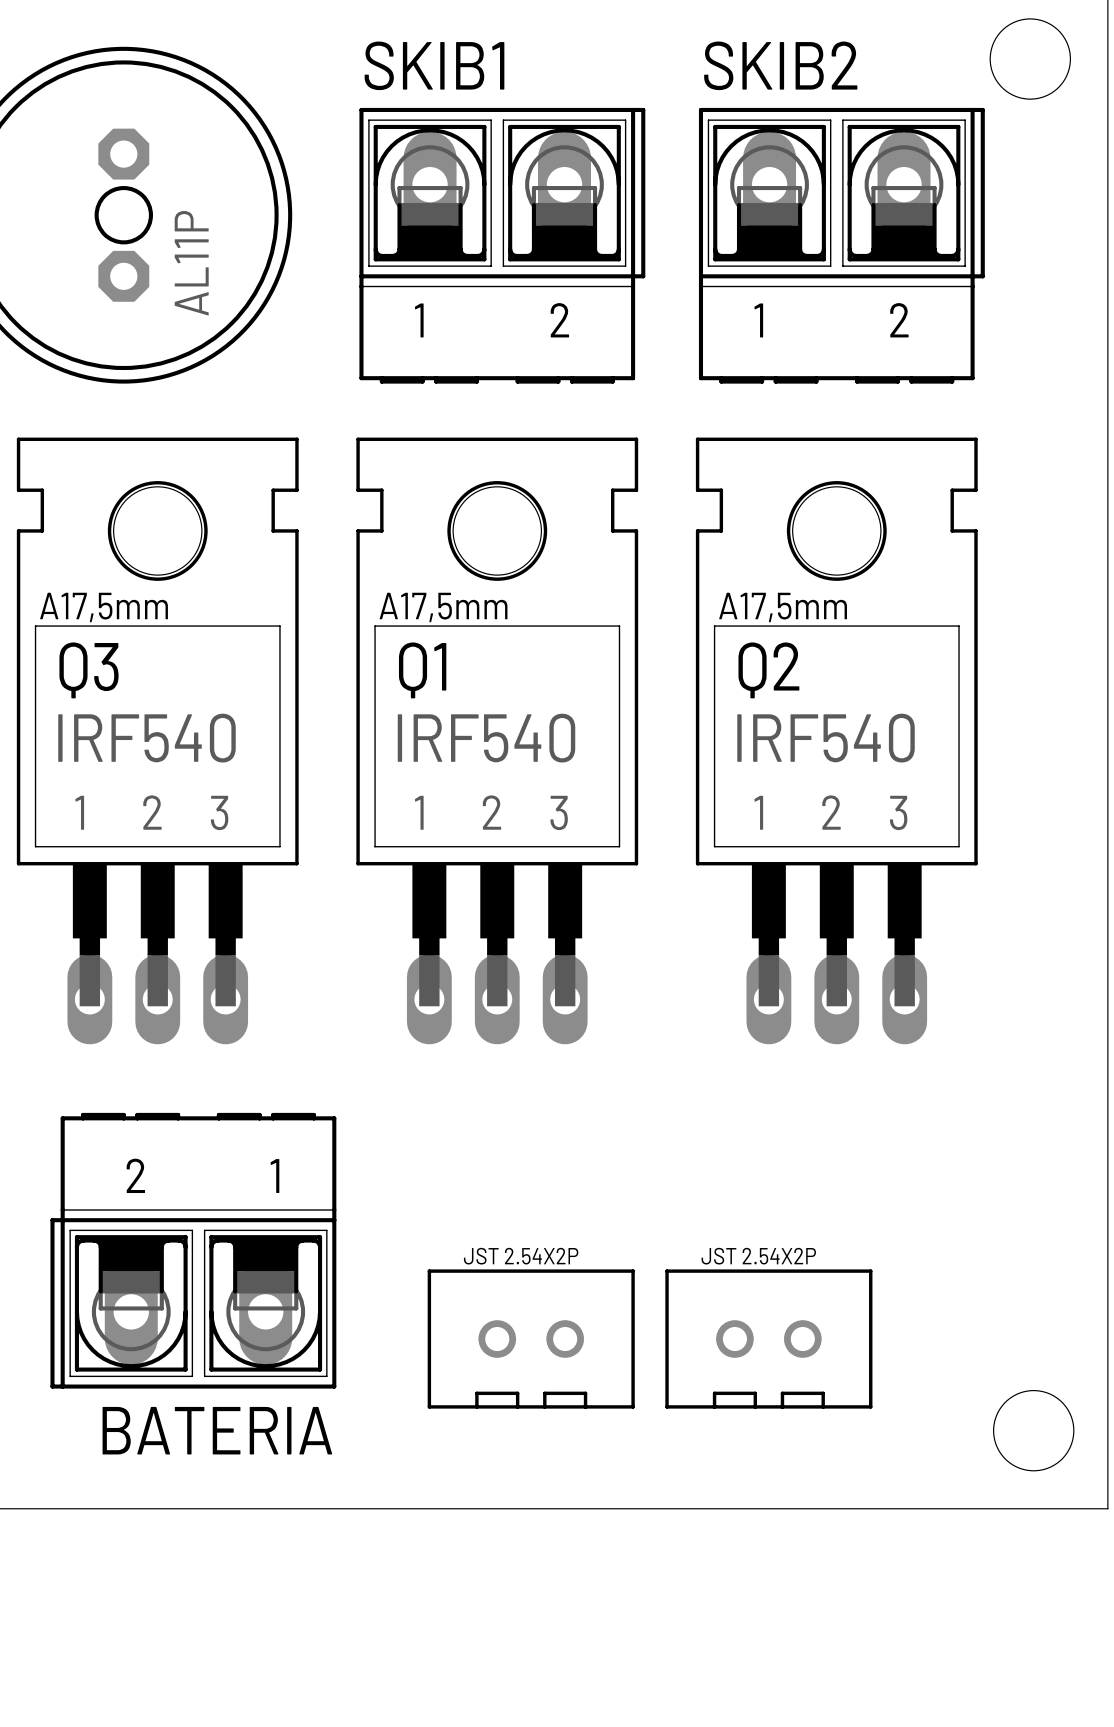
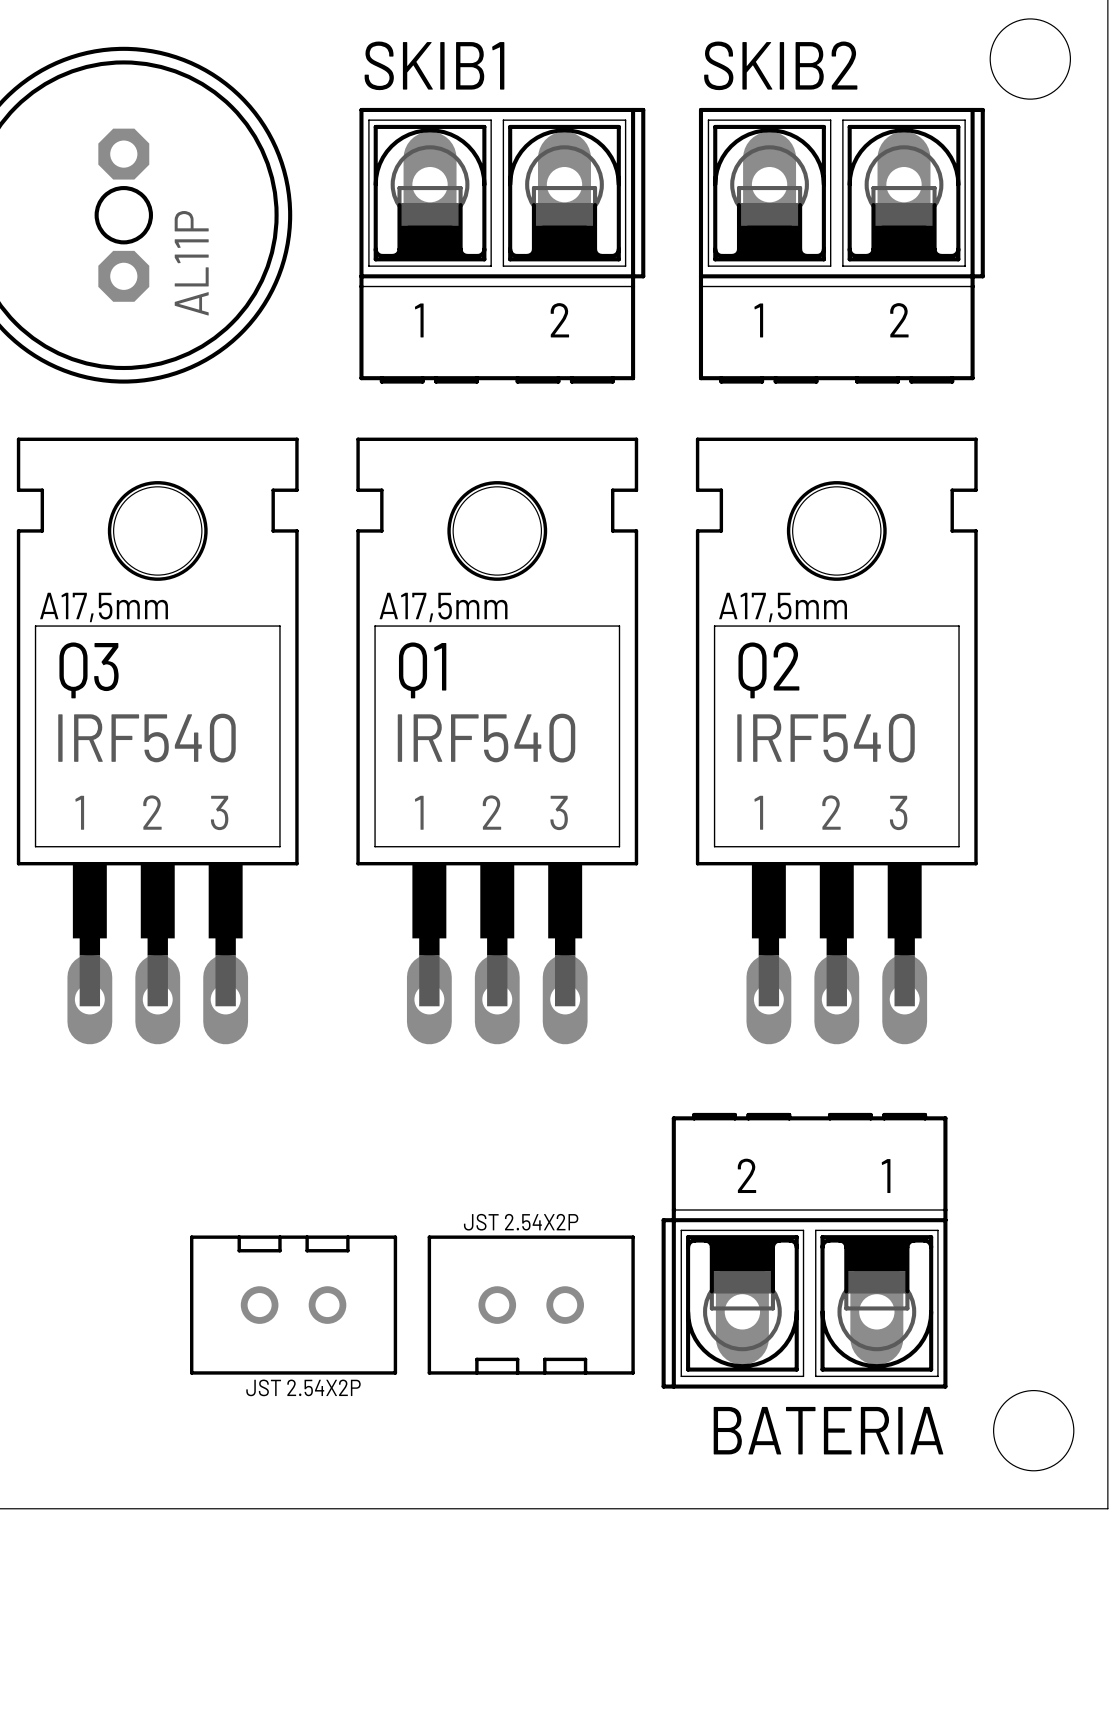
BATERIA position: (193, 1250) -> (804, 1250)
part: none -> (293, 1305)
part position: (531, 1339) -> (531, 1305)
part: (768, 1339) -> none

